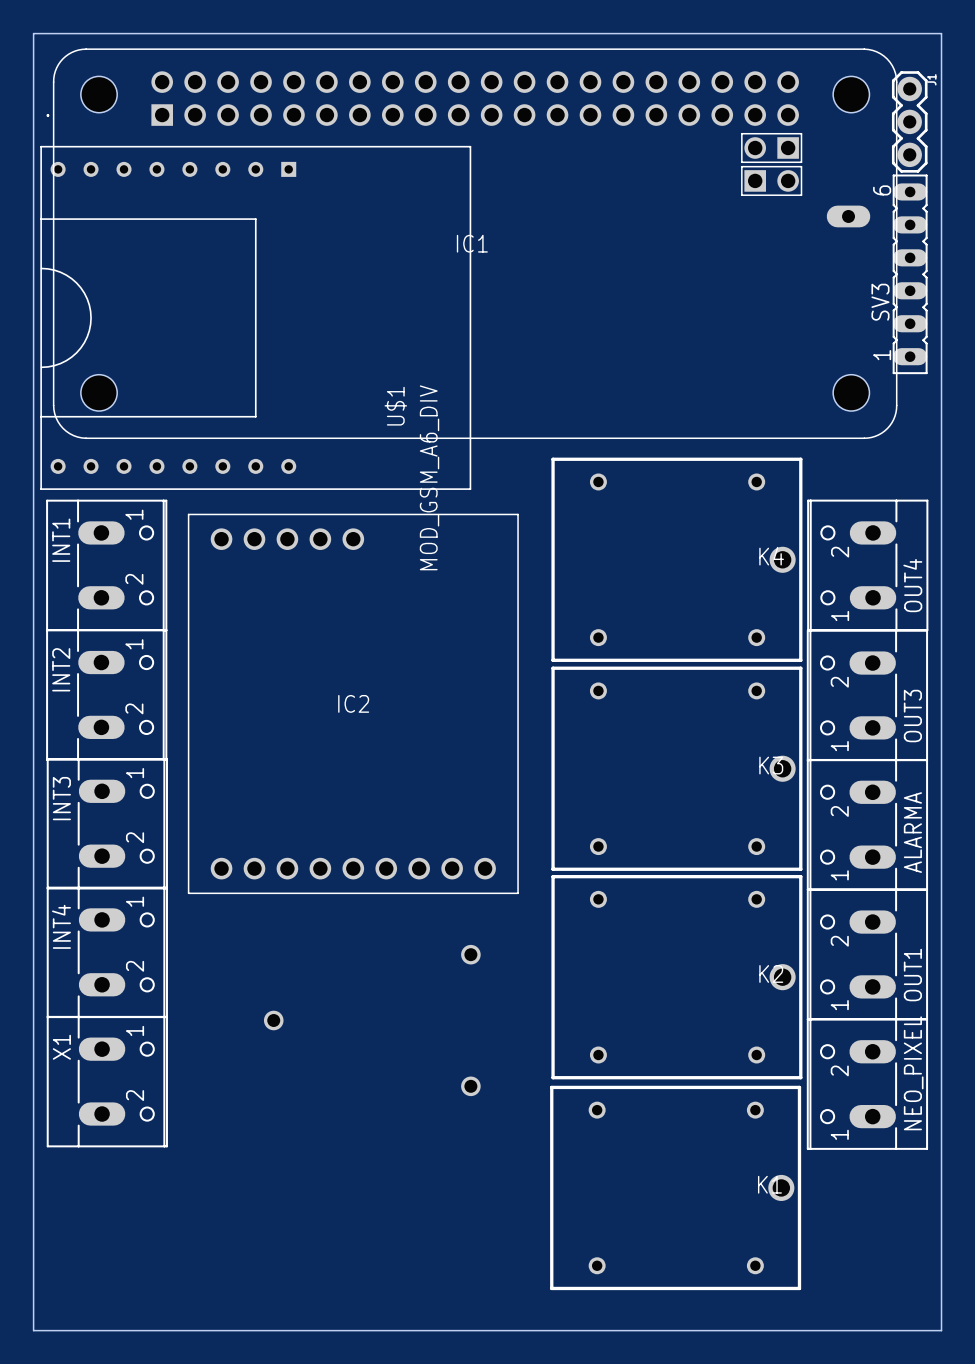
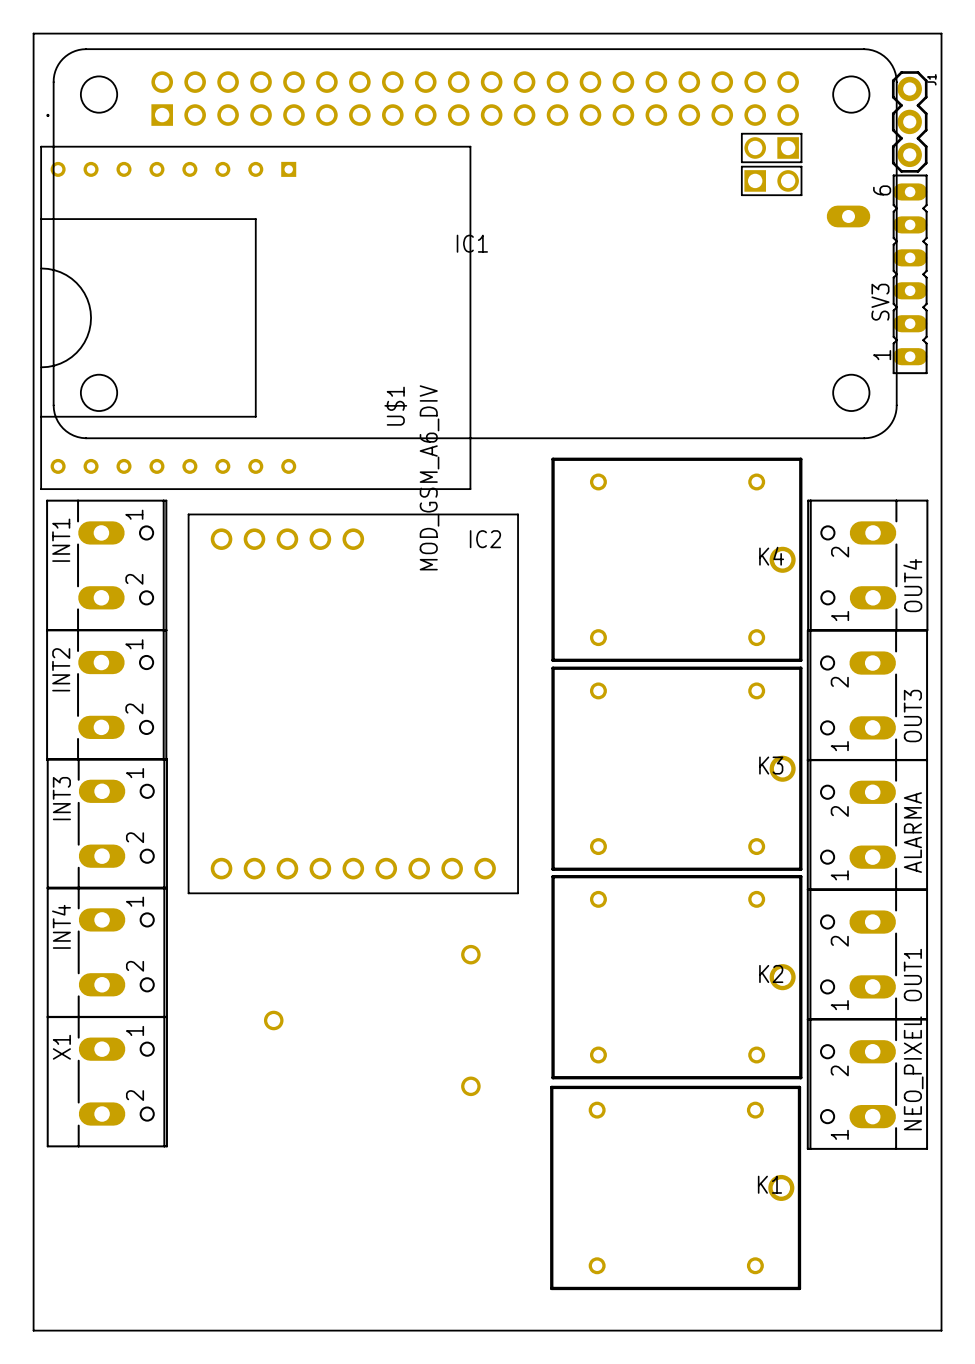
IC2 name position: IC2 (353, 703) -> IC2 (485, 539)

